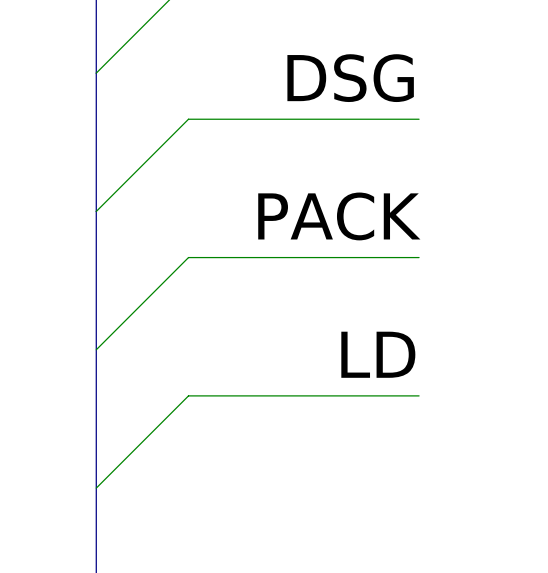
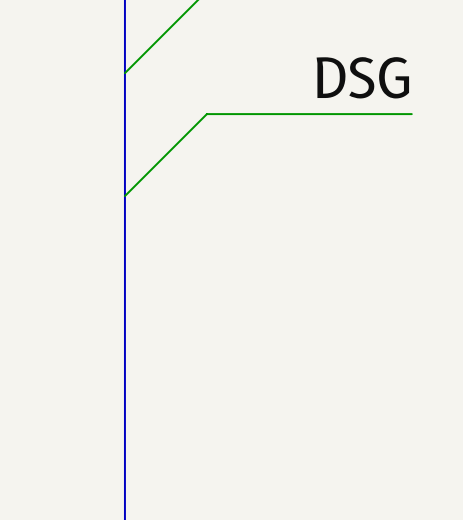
label: PACK (339, 216) -> none
wire: (419, 257) (188, 257) (96, 349) -> none
label: LD (378, 354) -> none
wire: (419, 395) (188, 395) (96, 488) -> none

